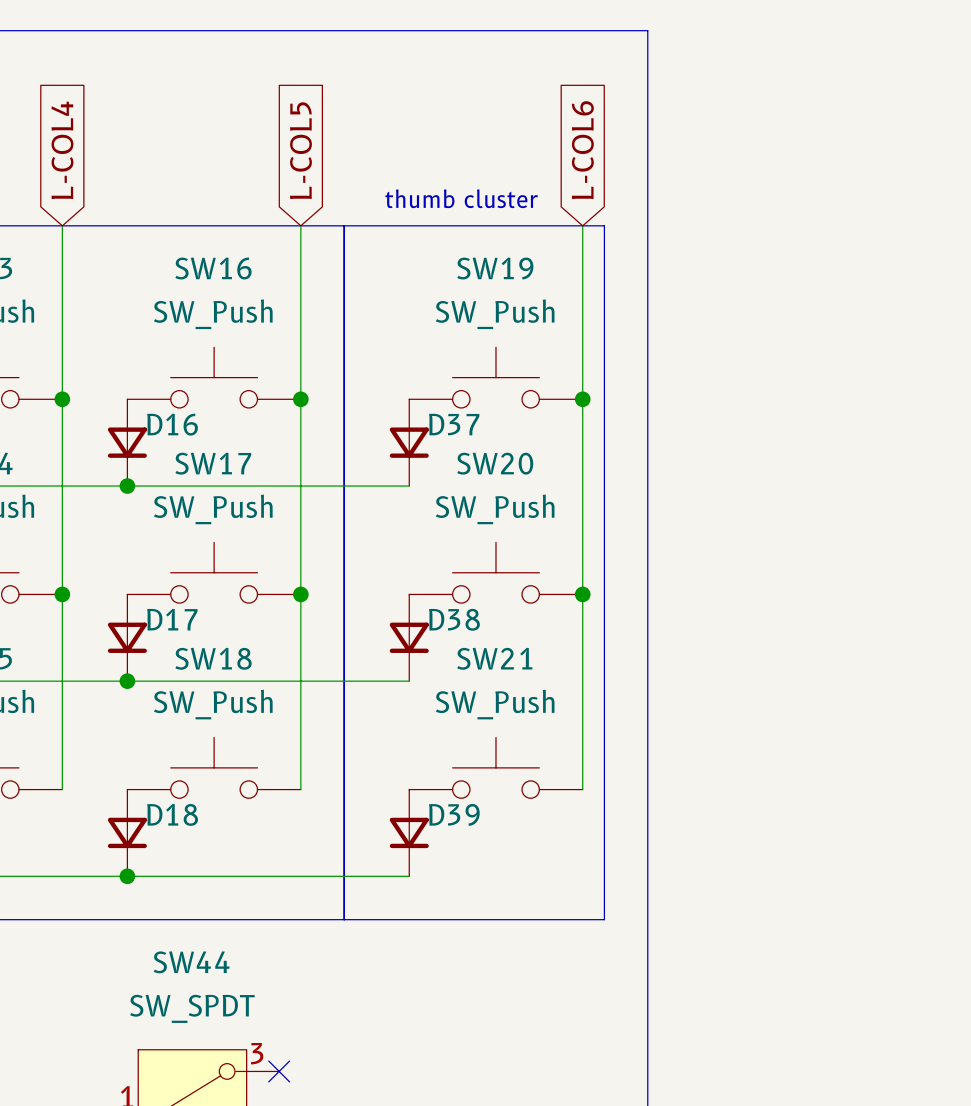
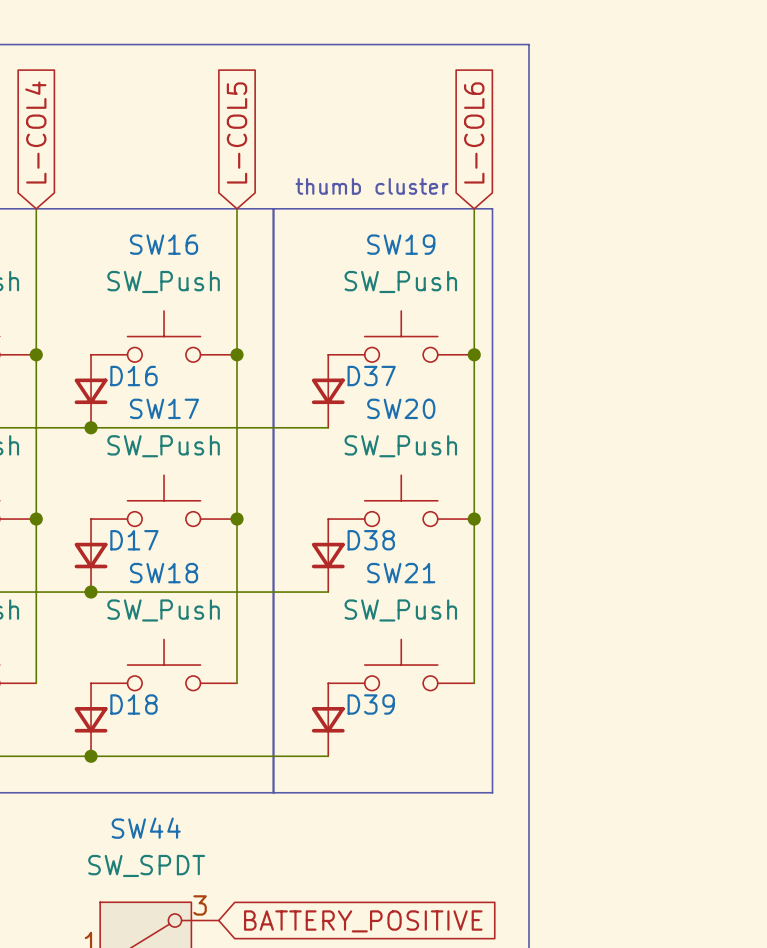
no-connect mark: (279, 1071) -> none
global label: none -> BATTERY_POSITIVE (363, 921)

